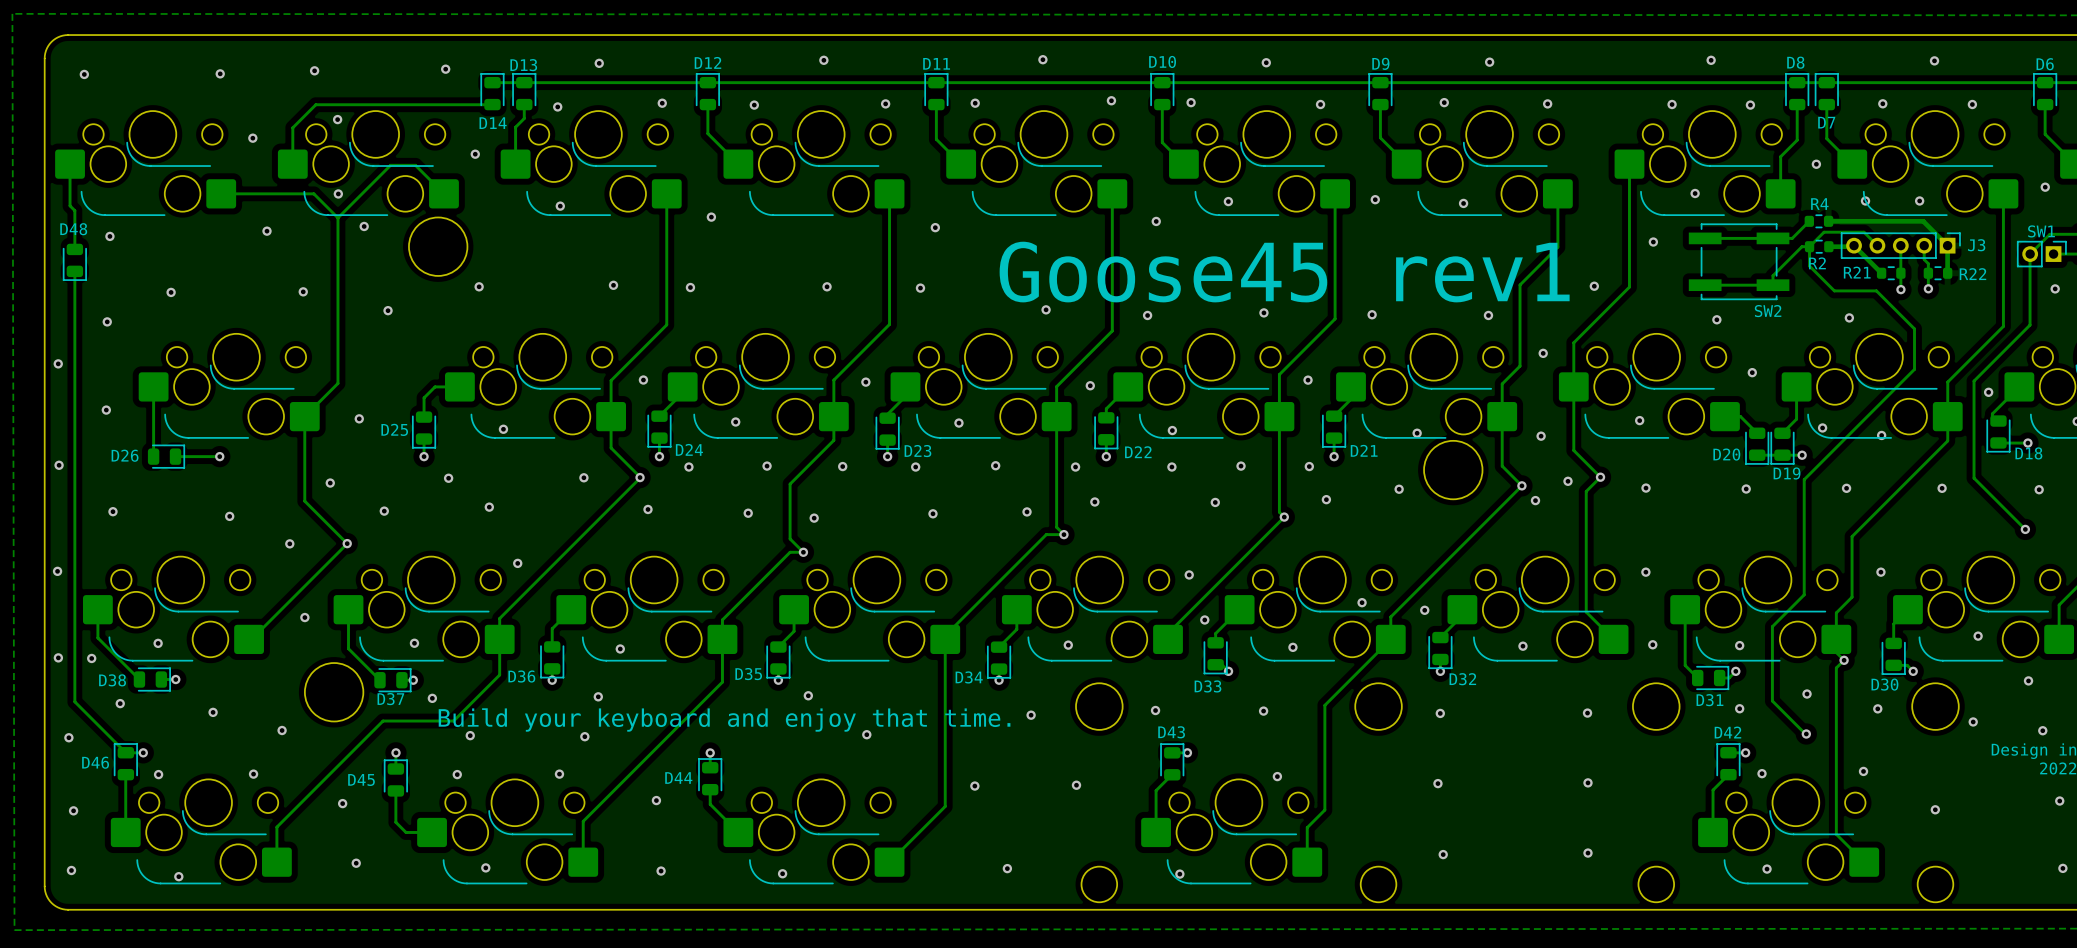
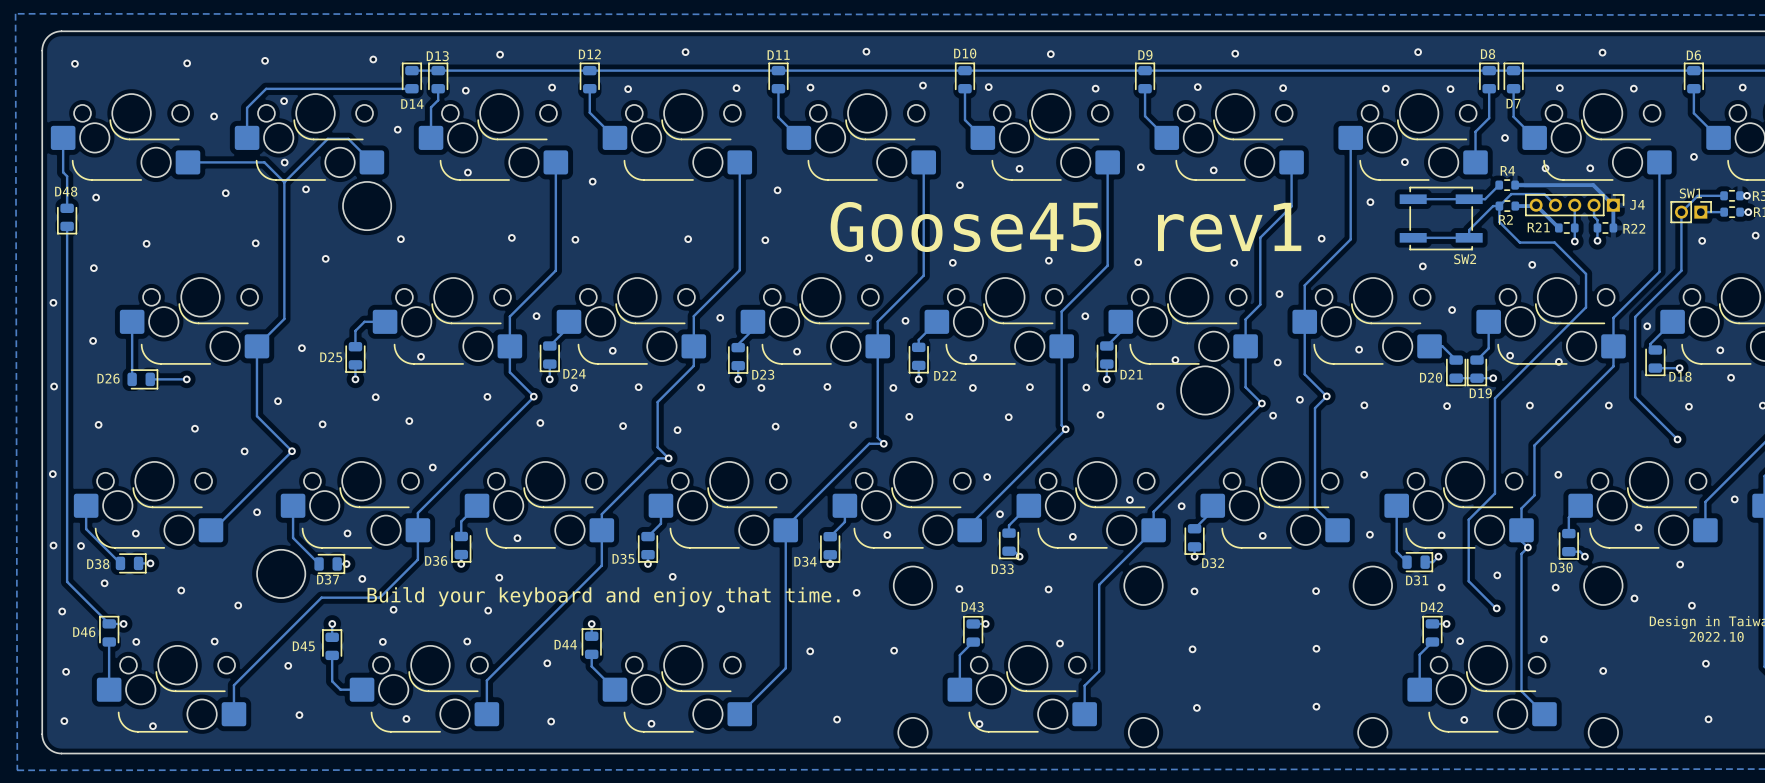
J3 name: J3 (1976, 245) -> J4 (1637, 204)

